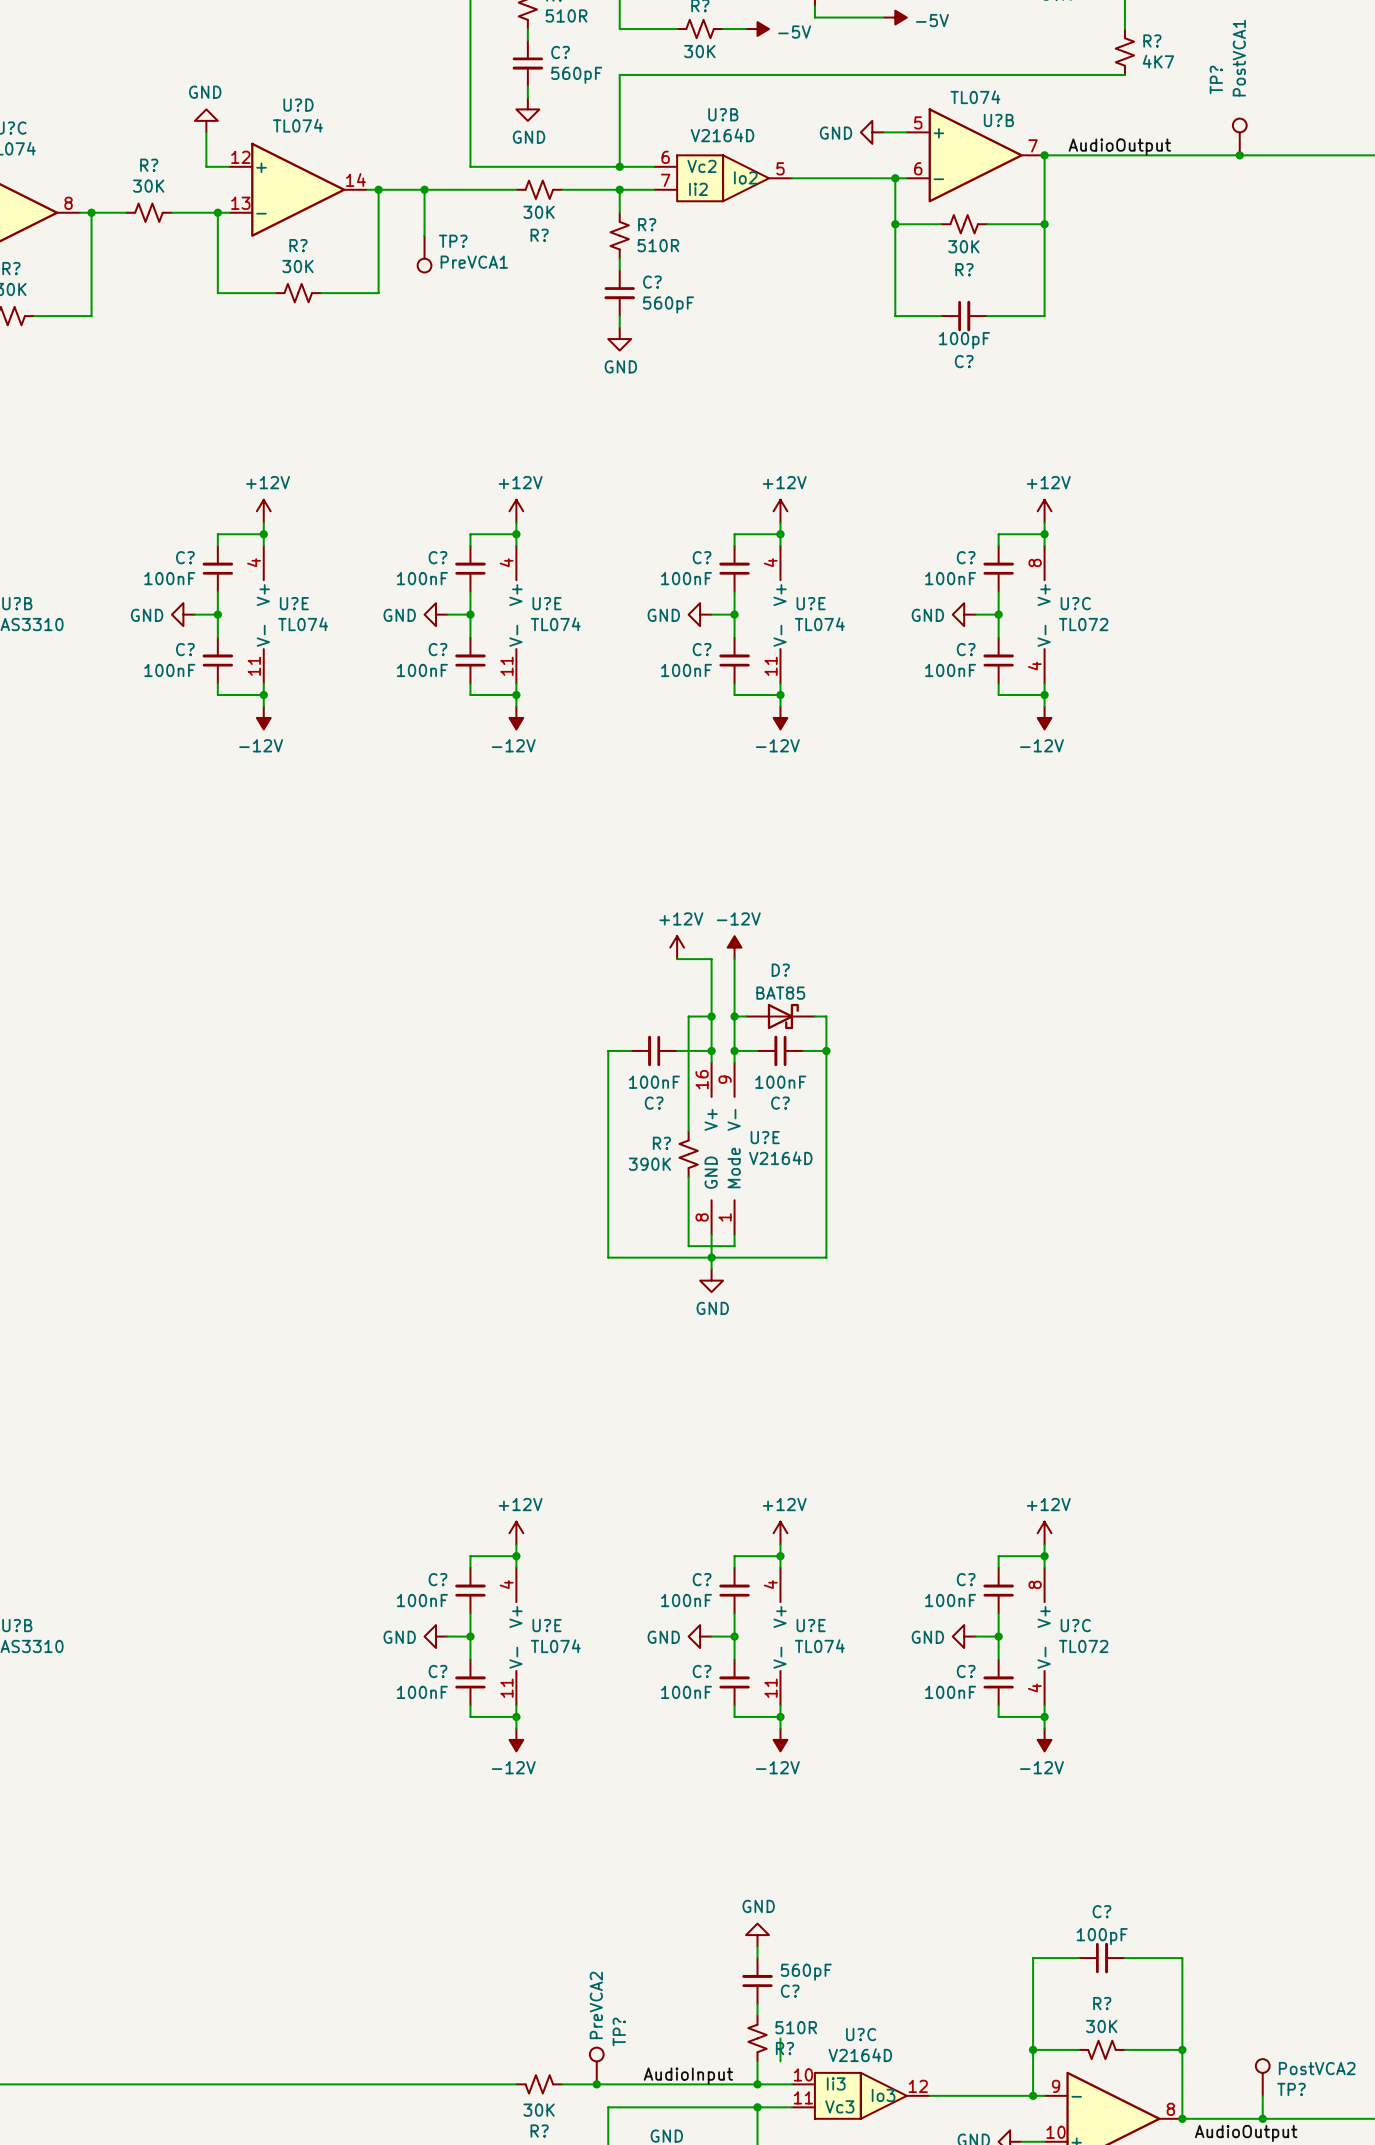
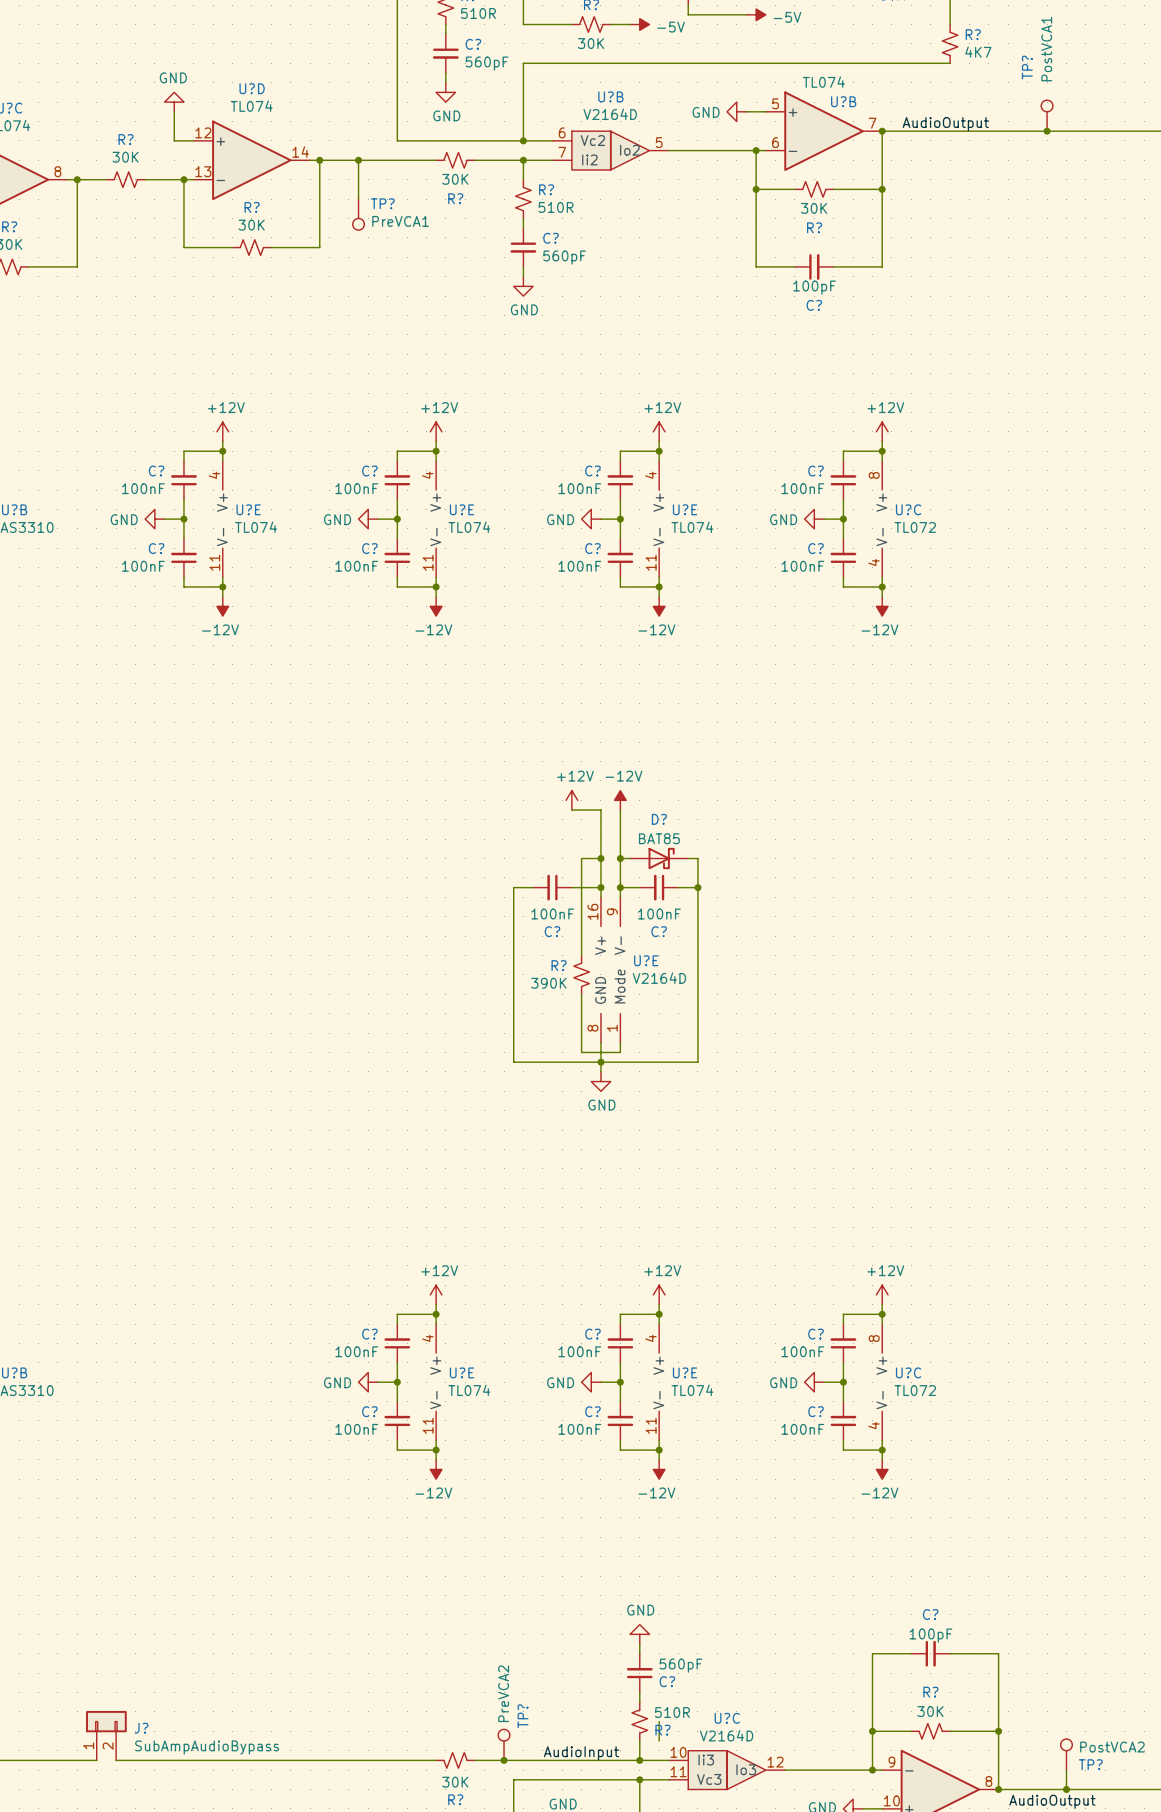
J?: none -> SubAmpAudioBypass (106, 1735)
wire: (114, 2084) (137, 2084) -> none

